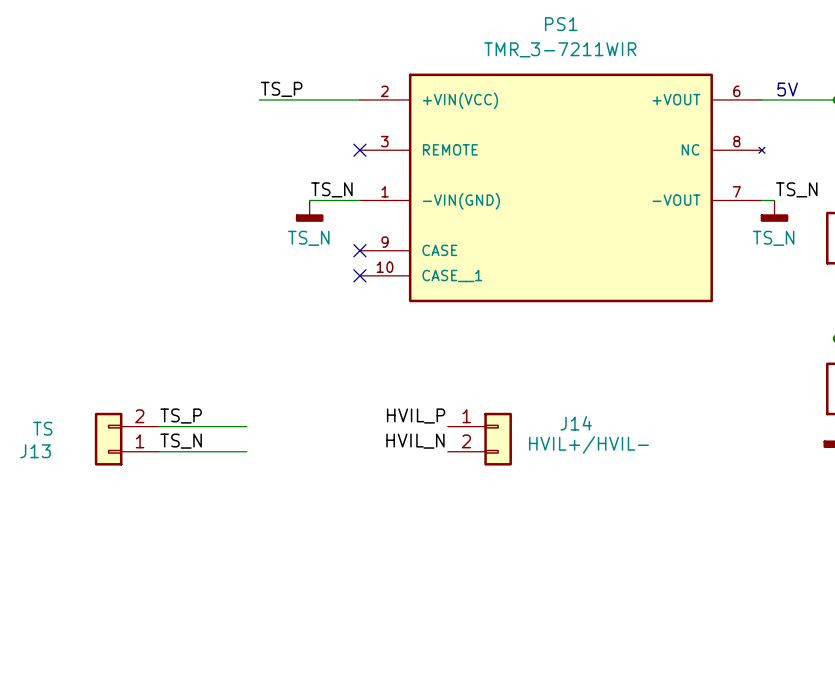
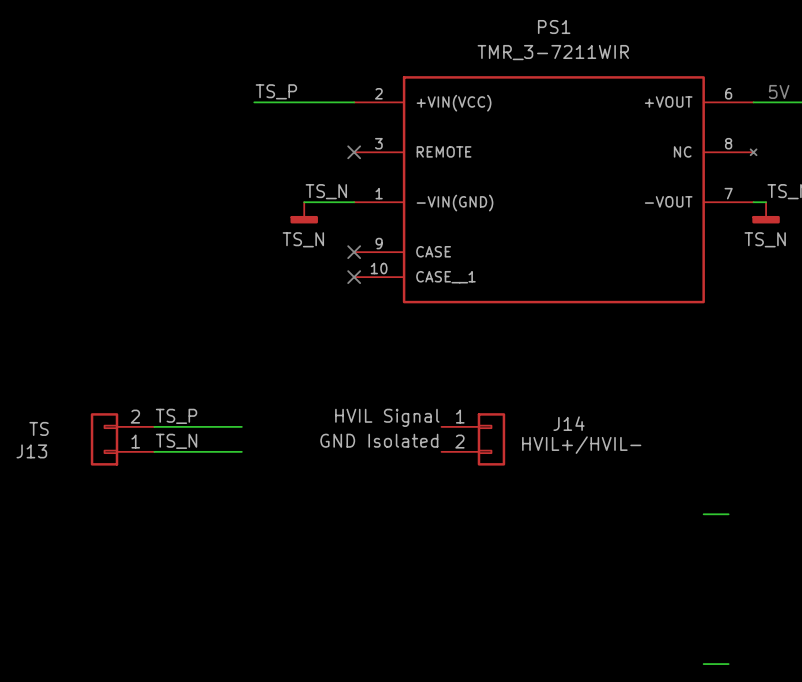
label: HVIL_P (416, 416) -> HVIL Signal (387, 417)
label: HVIL_N (415, 441) -> GND Isolated (379, 440)
wire: none -> (703, 514) (728, 514)
wire: none -> (703, 664) (728, 664)

